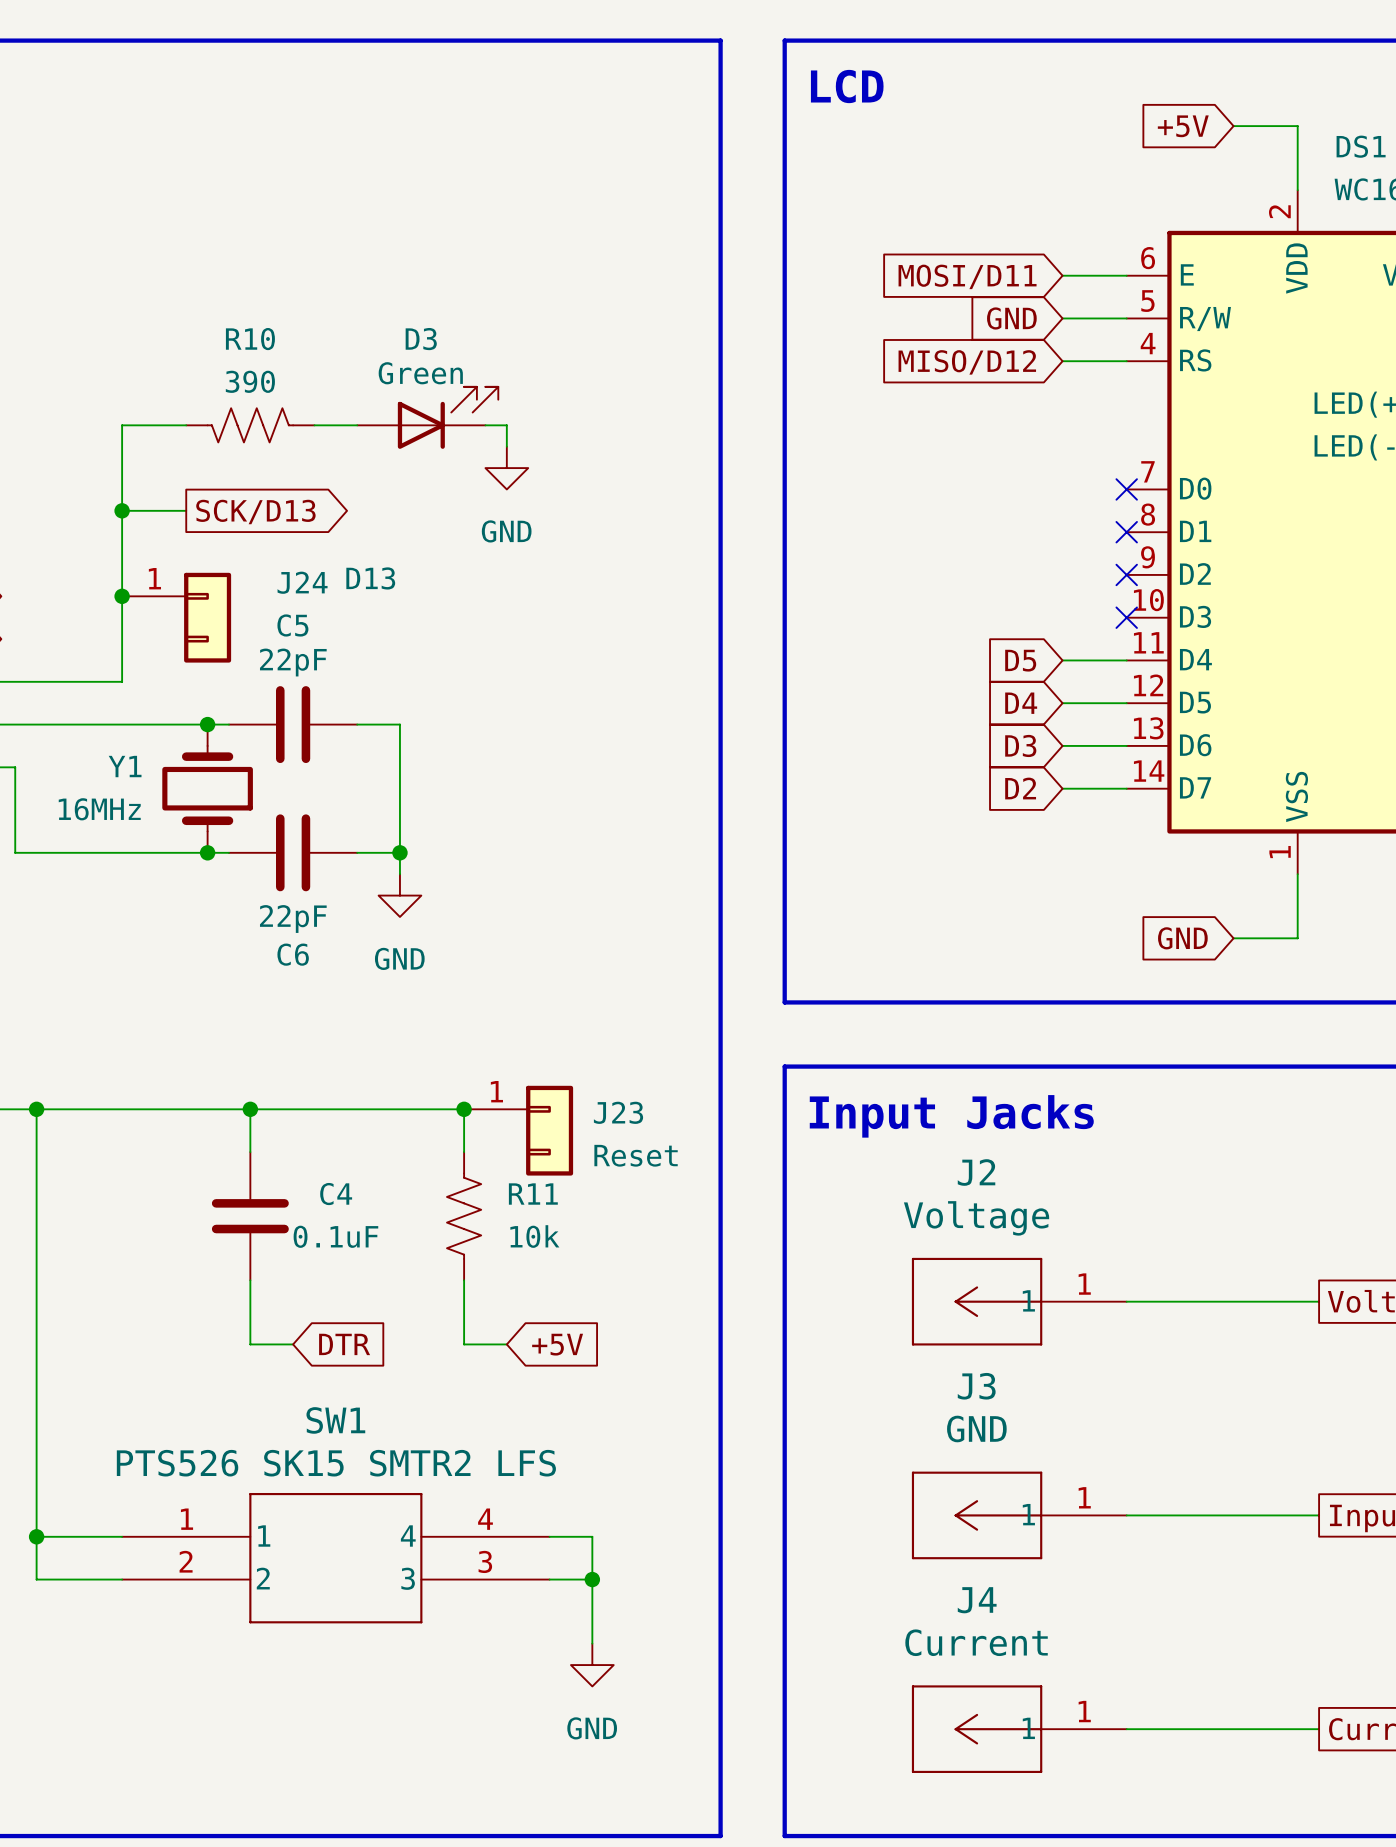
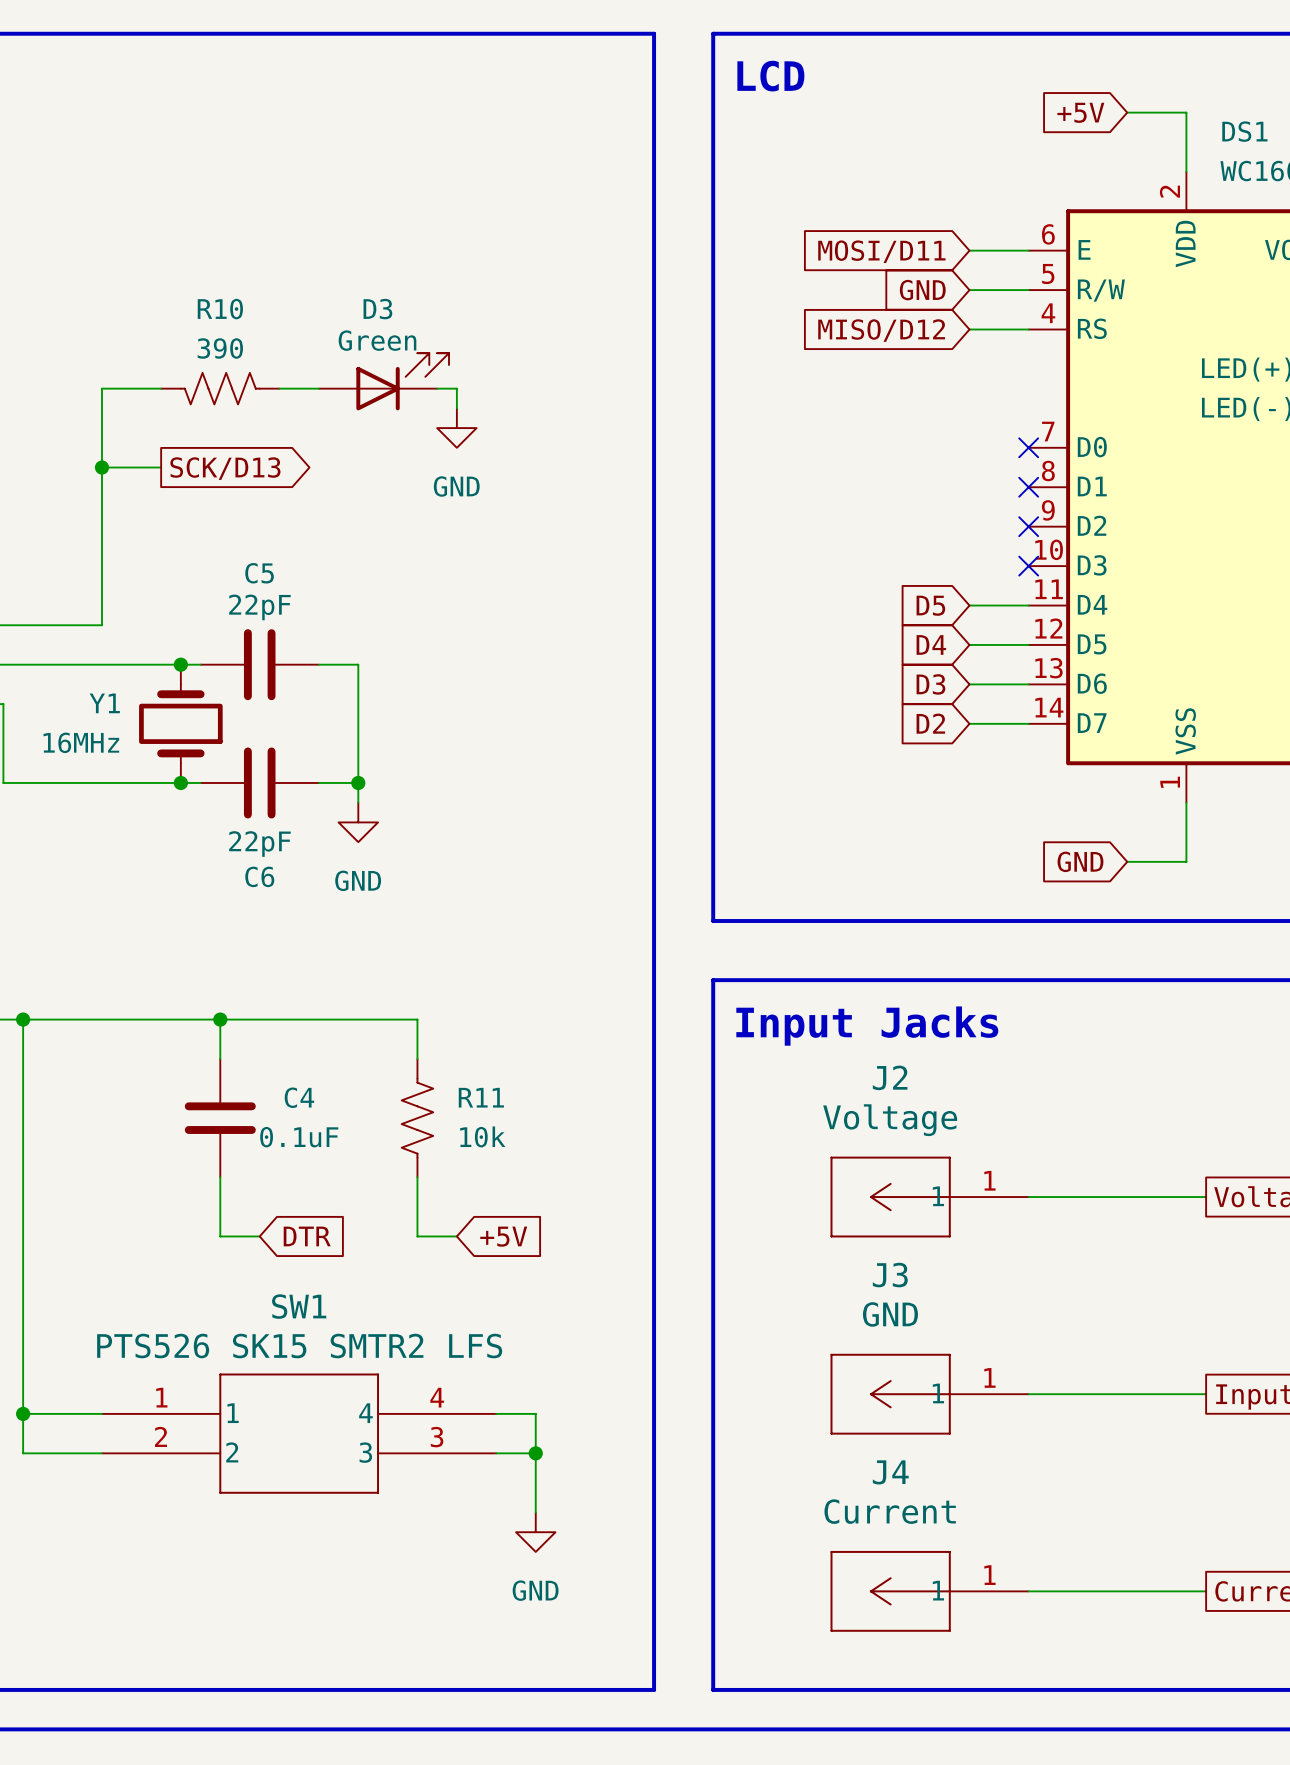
junction: (122, 596) -> none
J24: D13 (176, 617) -> none
junction: (464, 1109) -> none
J23: Reset (518, 1130) -> none

